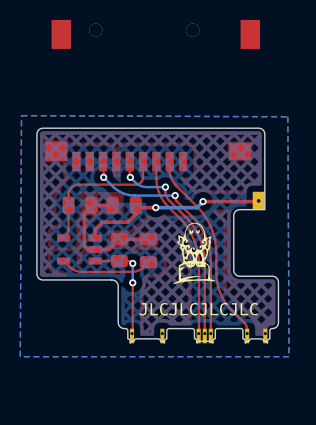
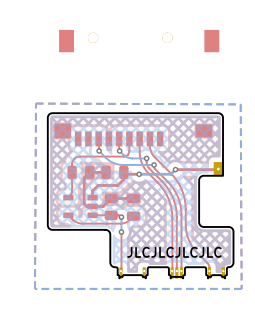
drawing: [173, 222, 216, 285] -> none

